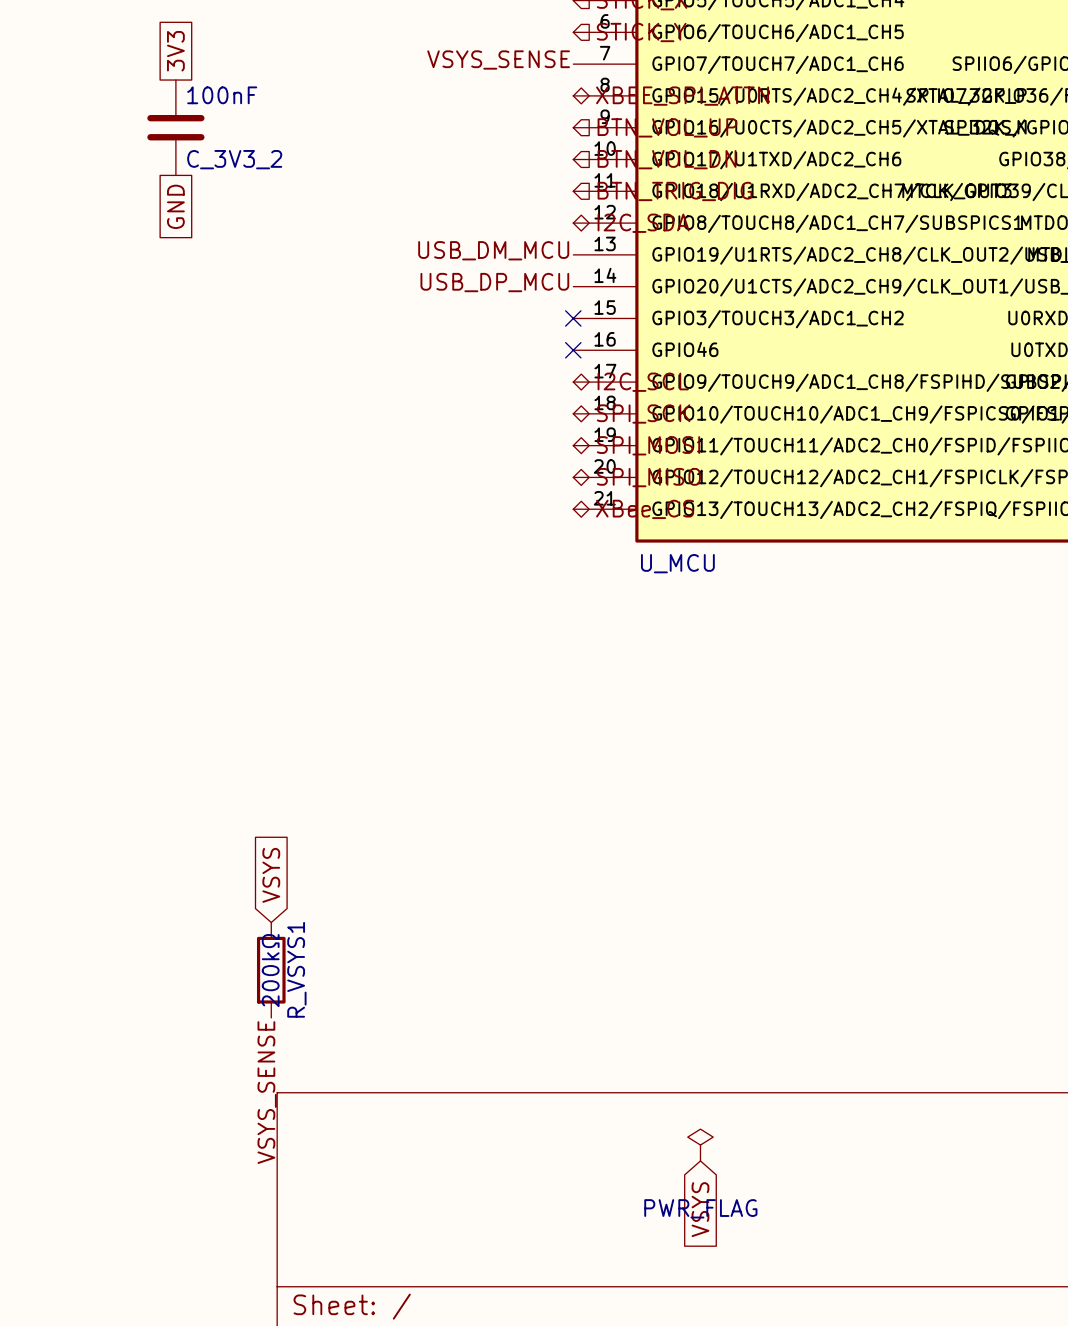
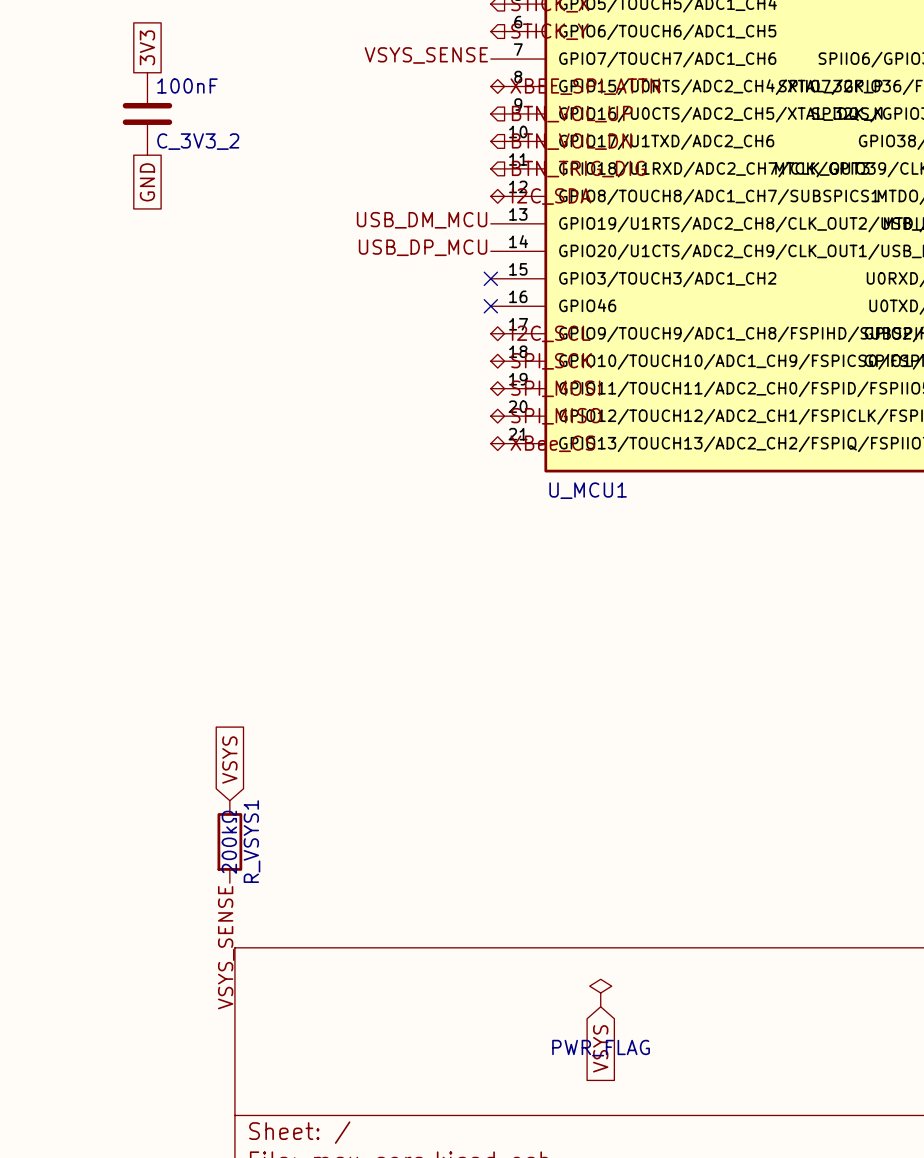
U_MCU name: U_MCU (677, 563) -> U_MCU1 (588, 490)

